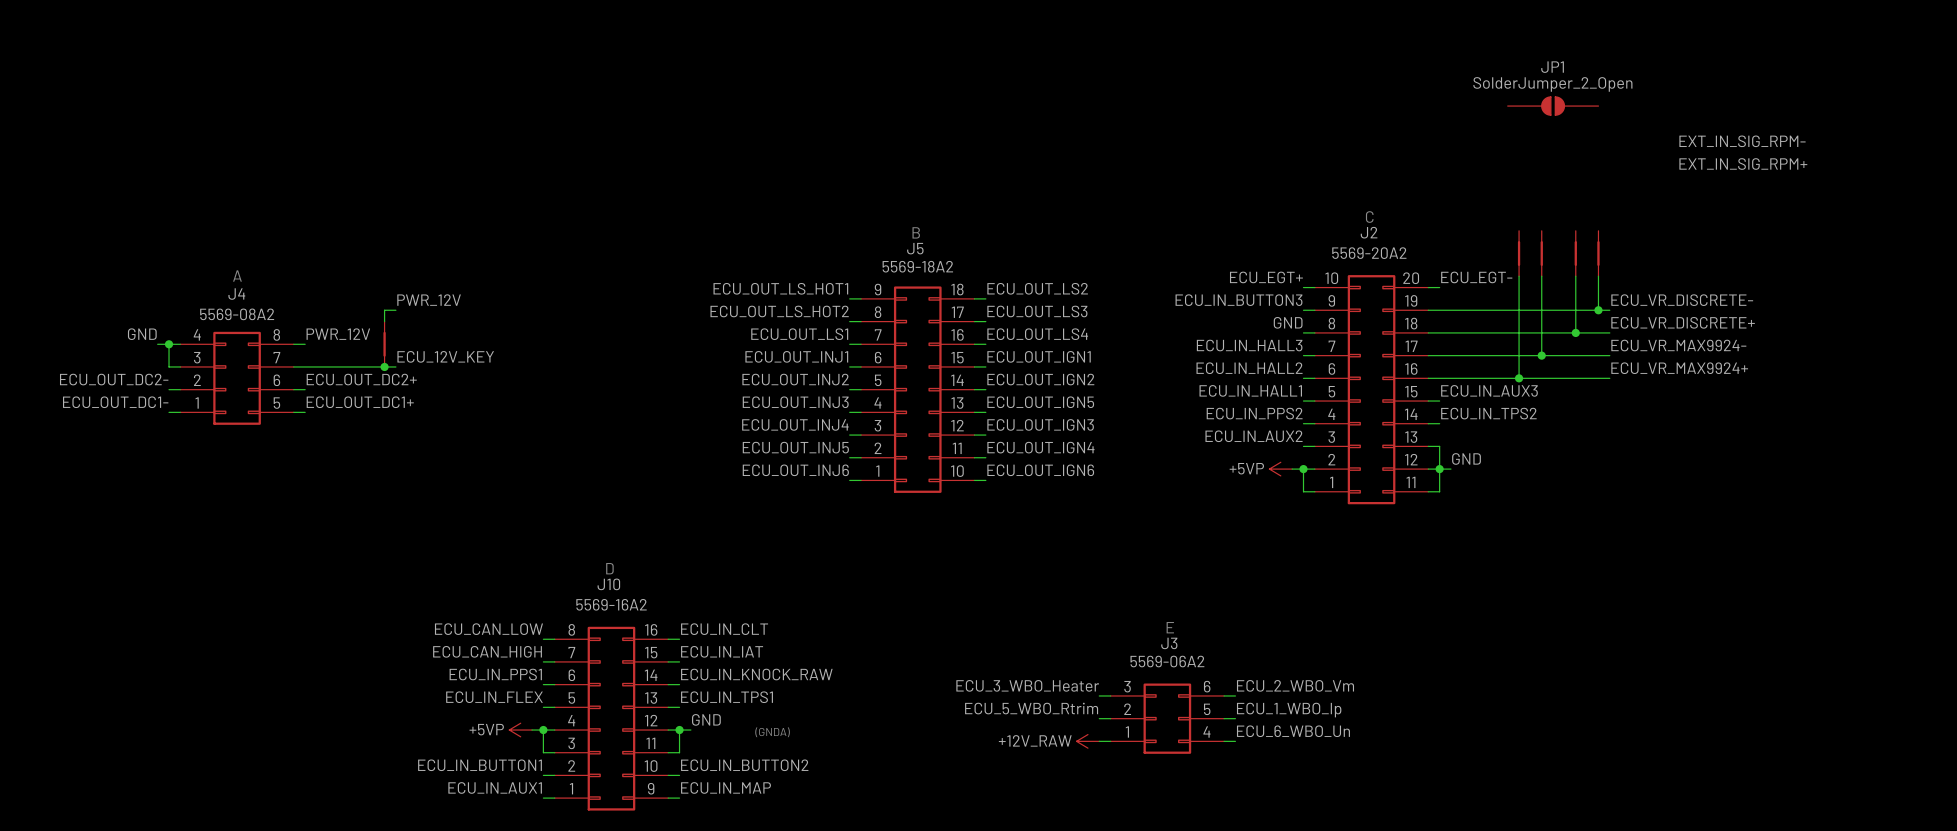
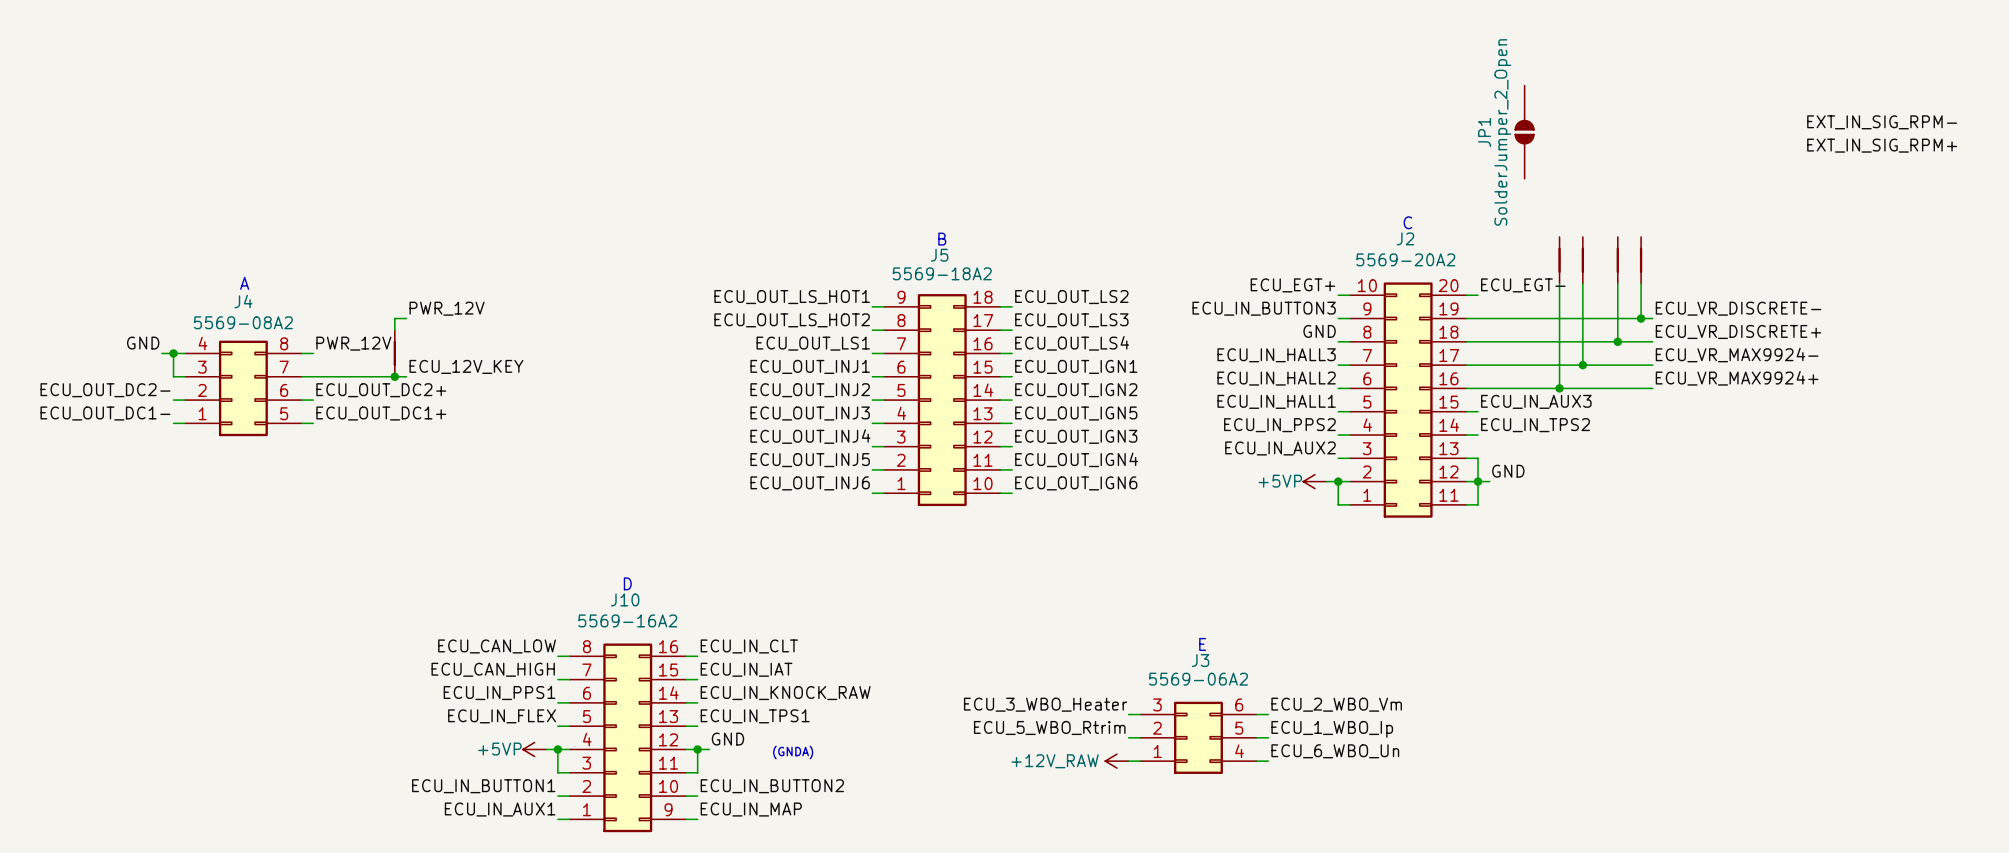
JP1 name position: JP1 (1552, 67) -> JP1 (1484, 132)
JP1 value position: SolderJumper_2_Open (1552, 84) -> SolderJumper_2_Open (1502, 132)
JP1 rotation: 0° (1553, 106) -> 90° clockwise (1524, 132)
JP1 position: (1553, 106) -> (1524, 132)
label position: EXT_IN_SIG_RPM- (1742, 141) -> EXT_IN_SIG_RPM- (1882, 122)
label position: EXT_IN_SIG_RPM+ (1743, 163) -> EXT_IN_SIG_RPM+ (1882, 145)

